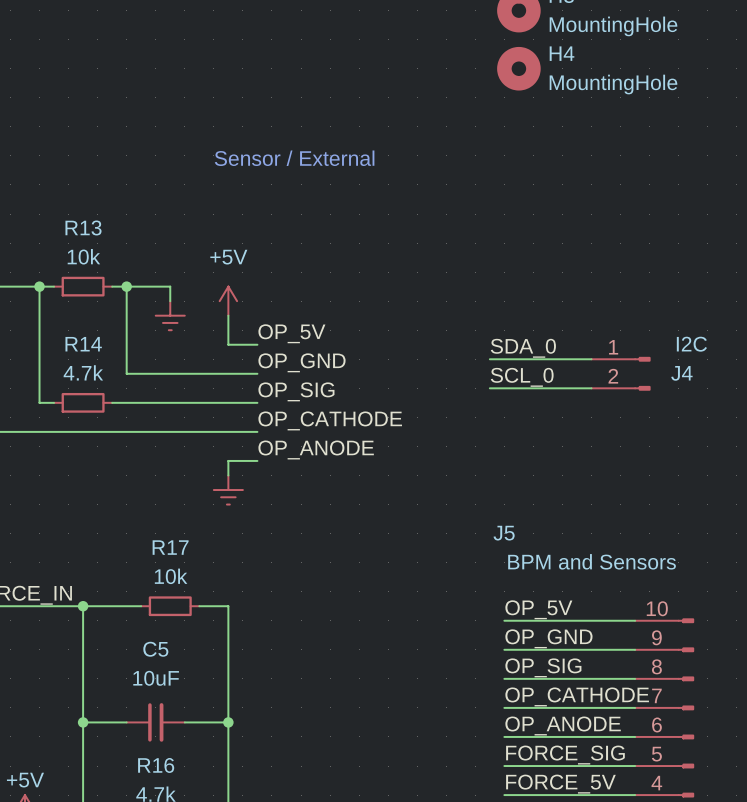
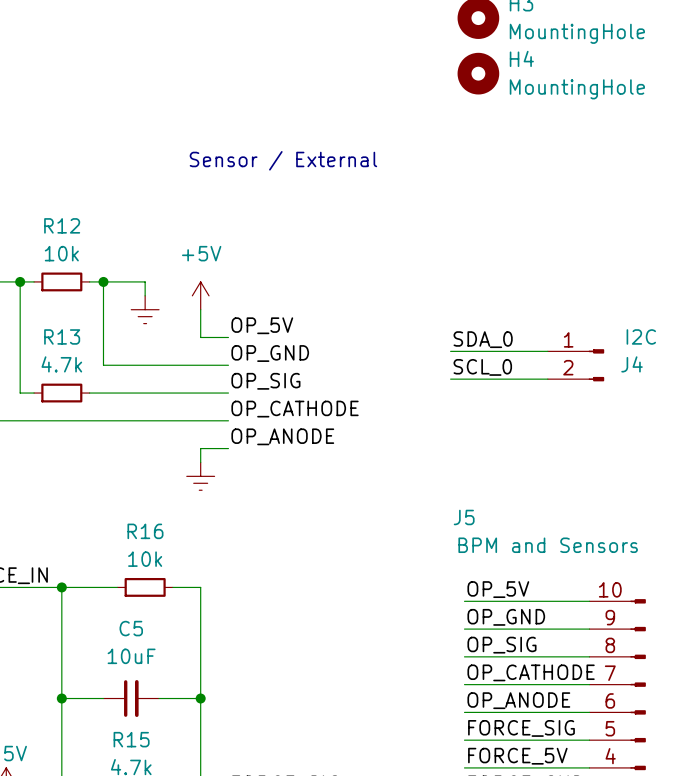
R13 name: R13 (83, 227) -> R12 (62, 225)
R14 name: R14 (83, 344) -> R13 (62, 336)
R17 name: R17 (170, 547) -> R16 (145, 531)
R16 name: R16 (156, 765) -> R15 (131, 739)

